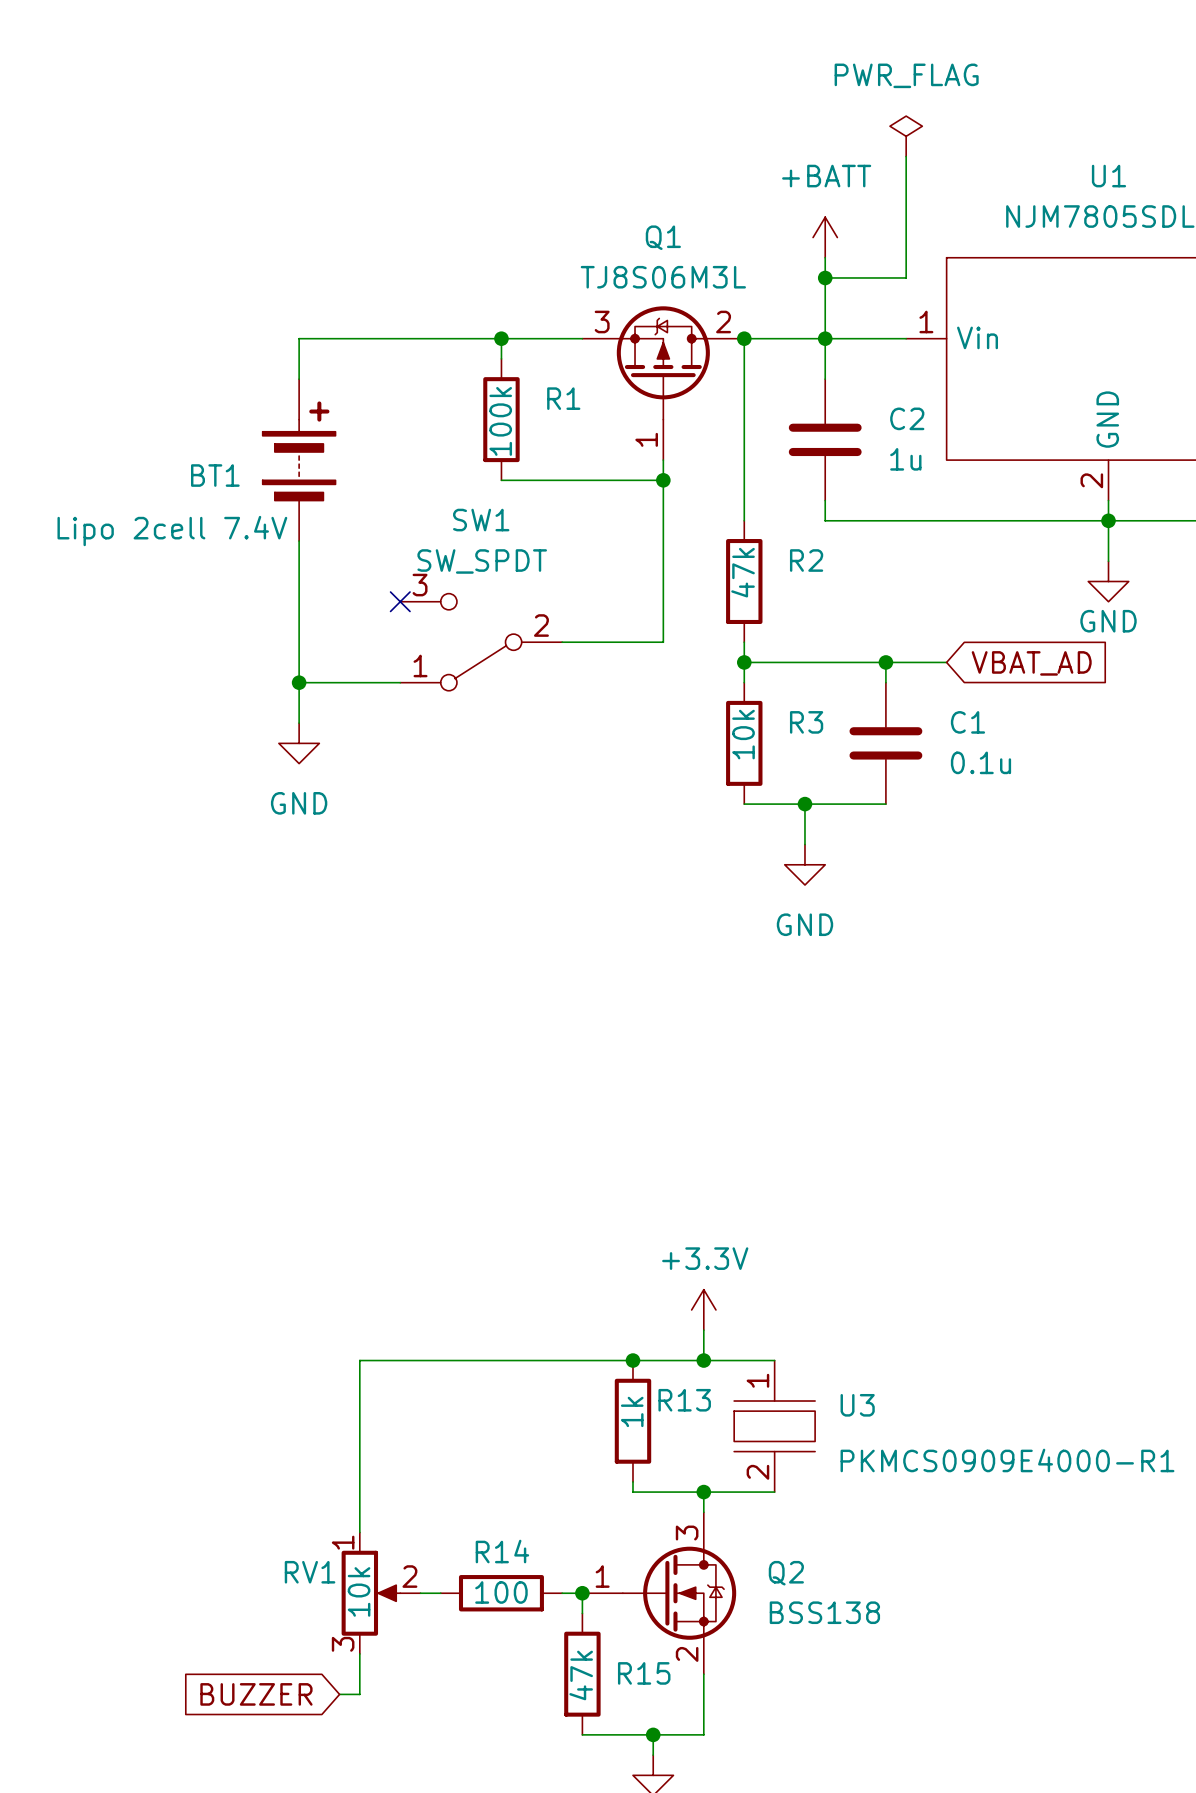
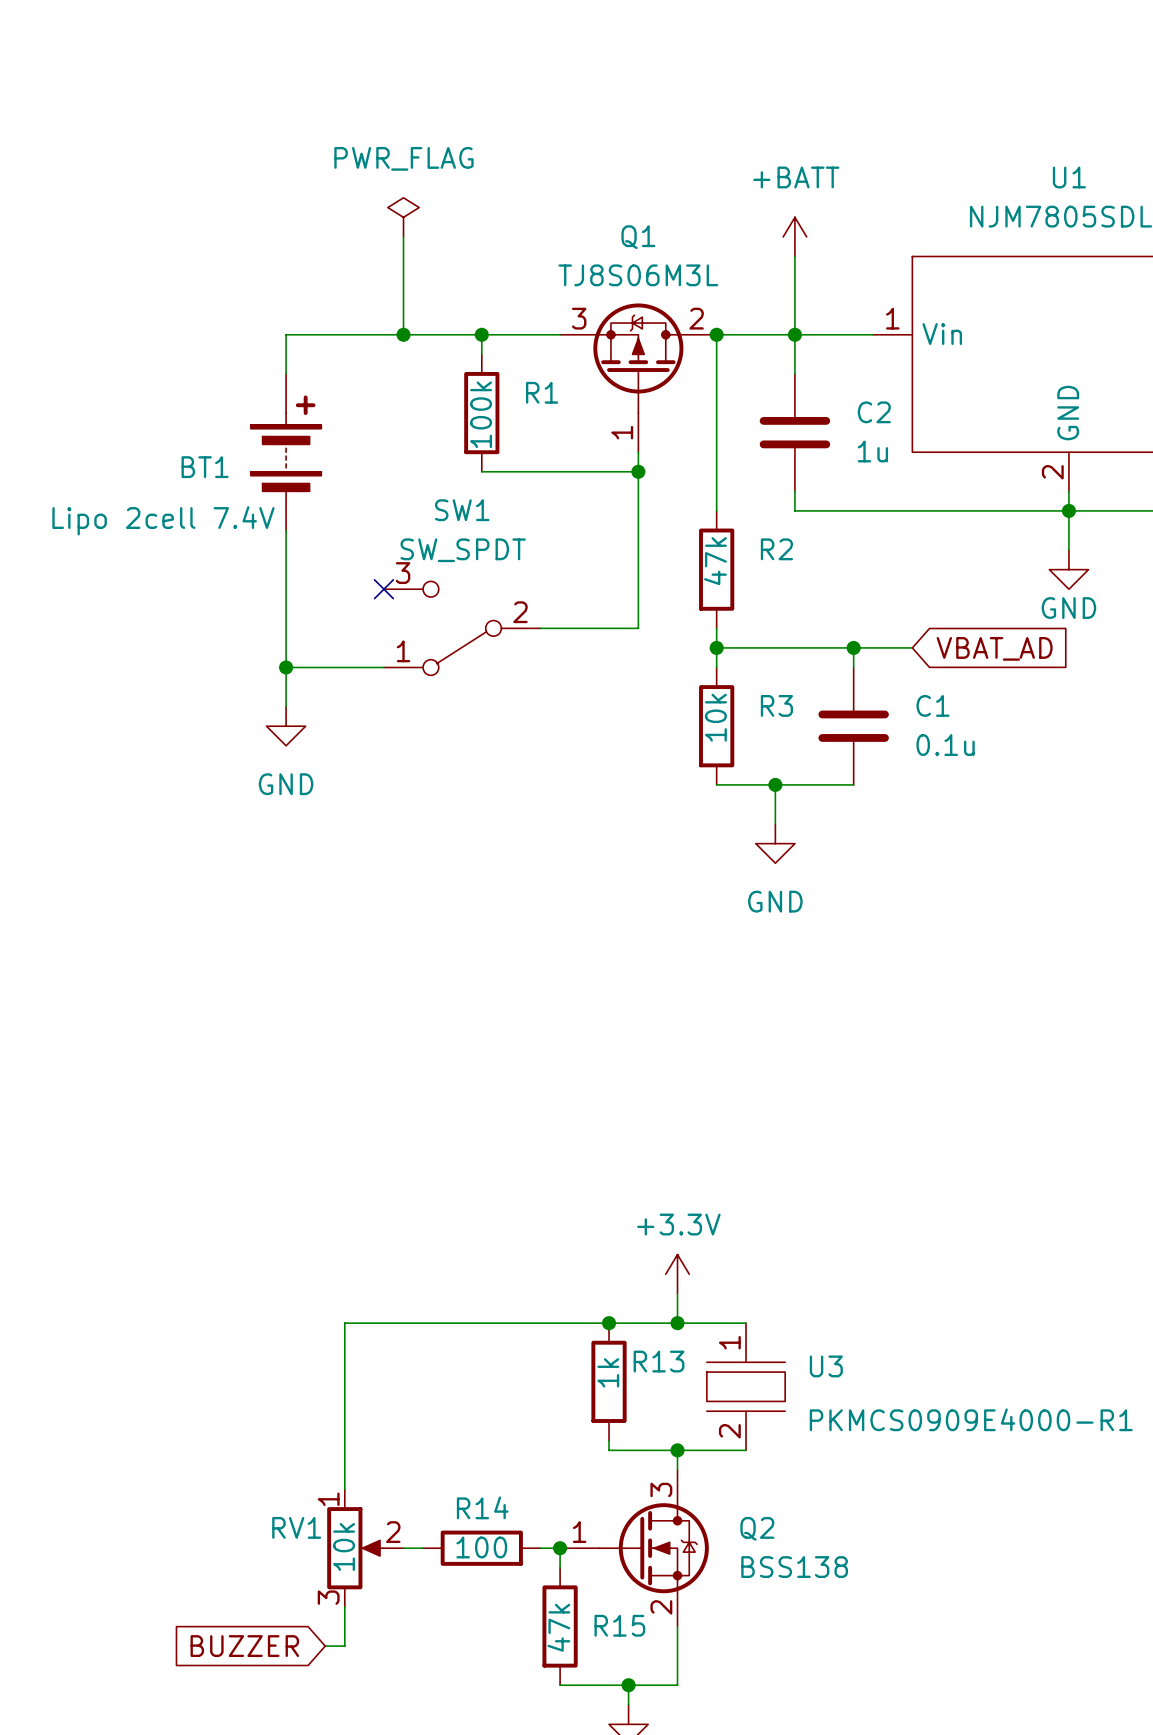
power symbol: PWR_FLAG (906, 136) -> none
wire: (906, 156) (906, 277) (825, 277) -> none
power symbol: none -> PWR_FLAG (403, 217)
wire: none -> (403, 236) (403, 334)
junction: (825, 277) -> none
junction: none -> (403, 334)

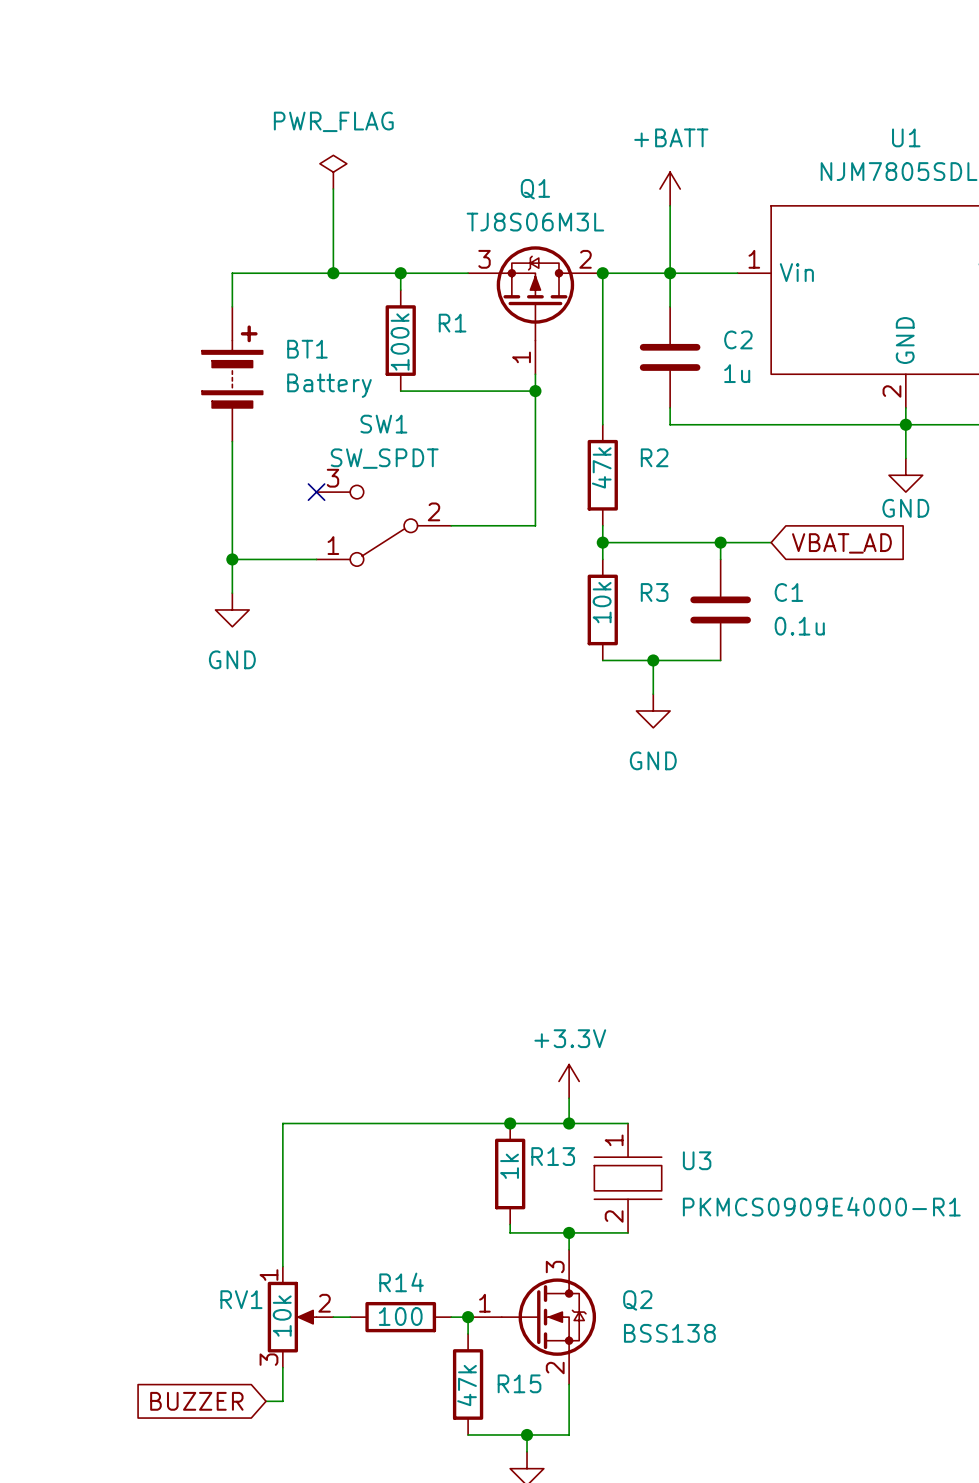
BT1 name position: BT1 (205, 467) -> BT1 (307, 349)
BT1 value: Lipo 2cell 7.4V (163, 520) -> Battery (329, 385)

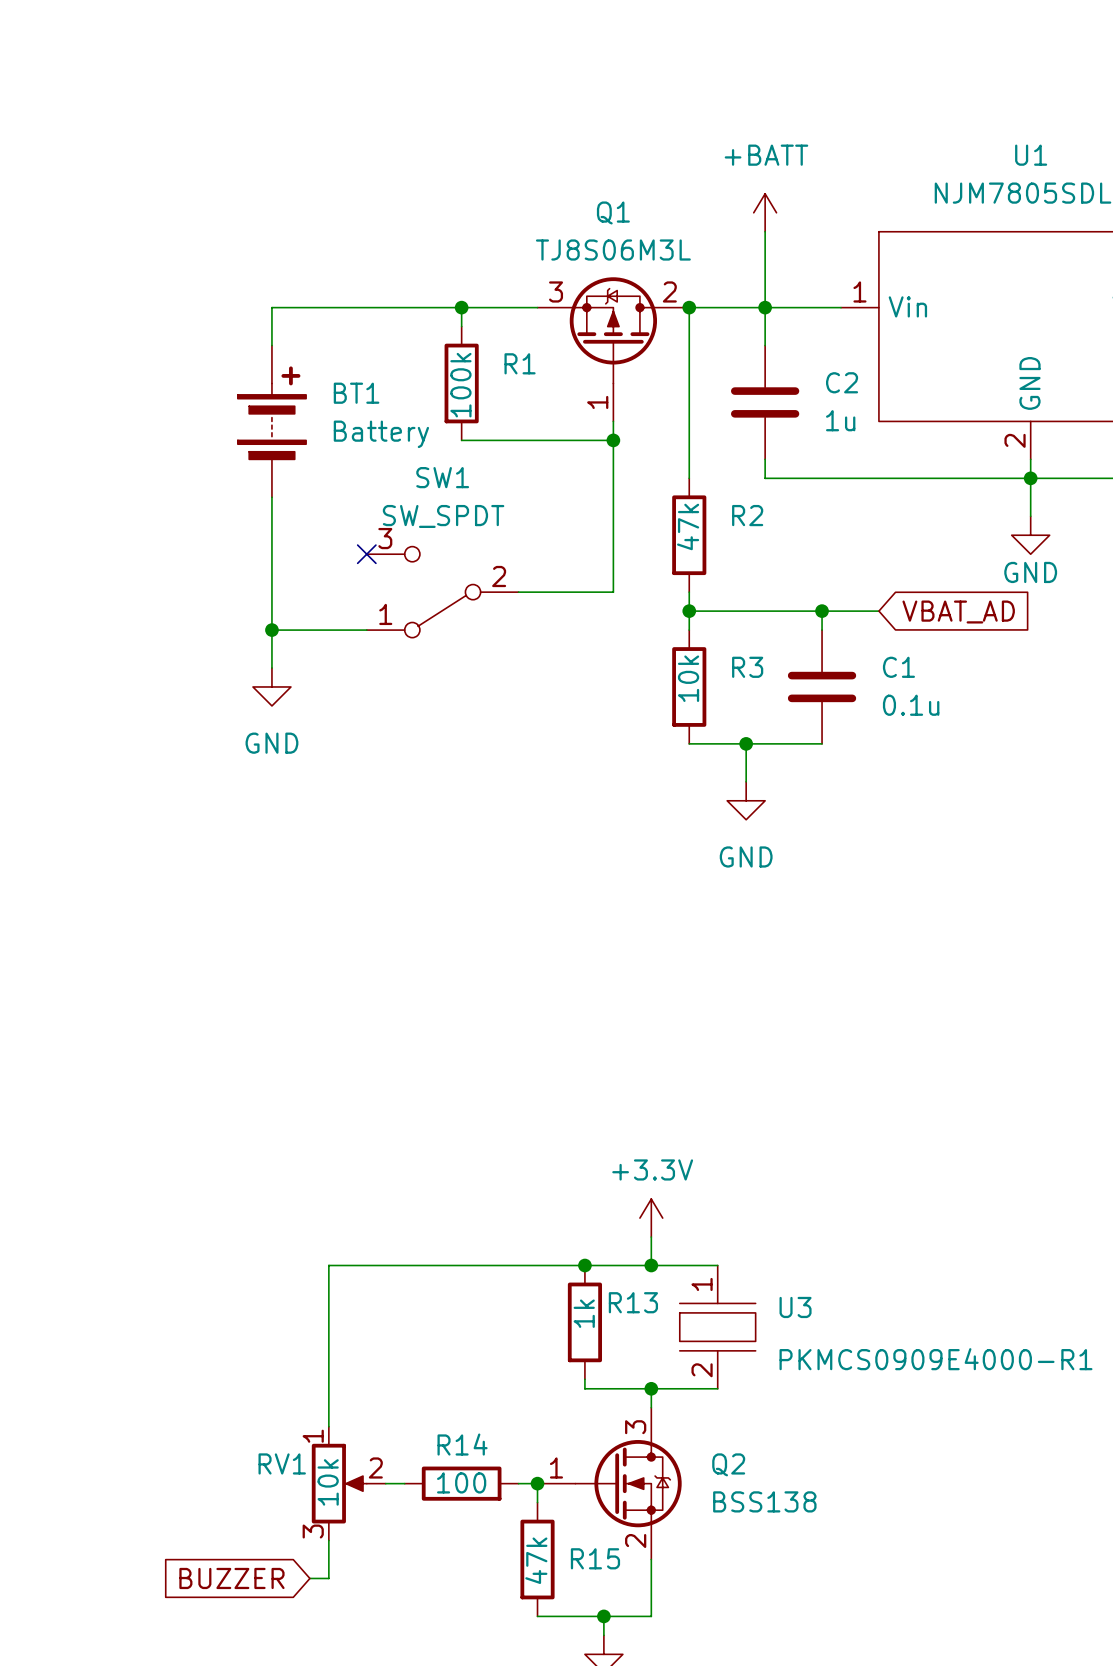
power symbol: PWR_FLAG (333, 172) -> none
wire: (333, 189) (333, 273) -> none
junction: (333, 273) -> none

